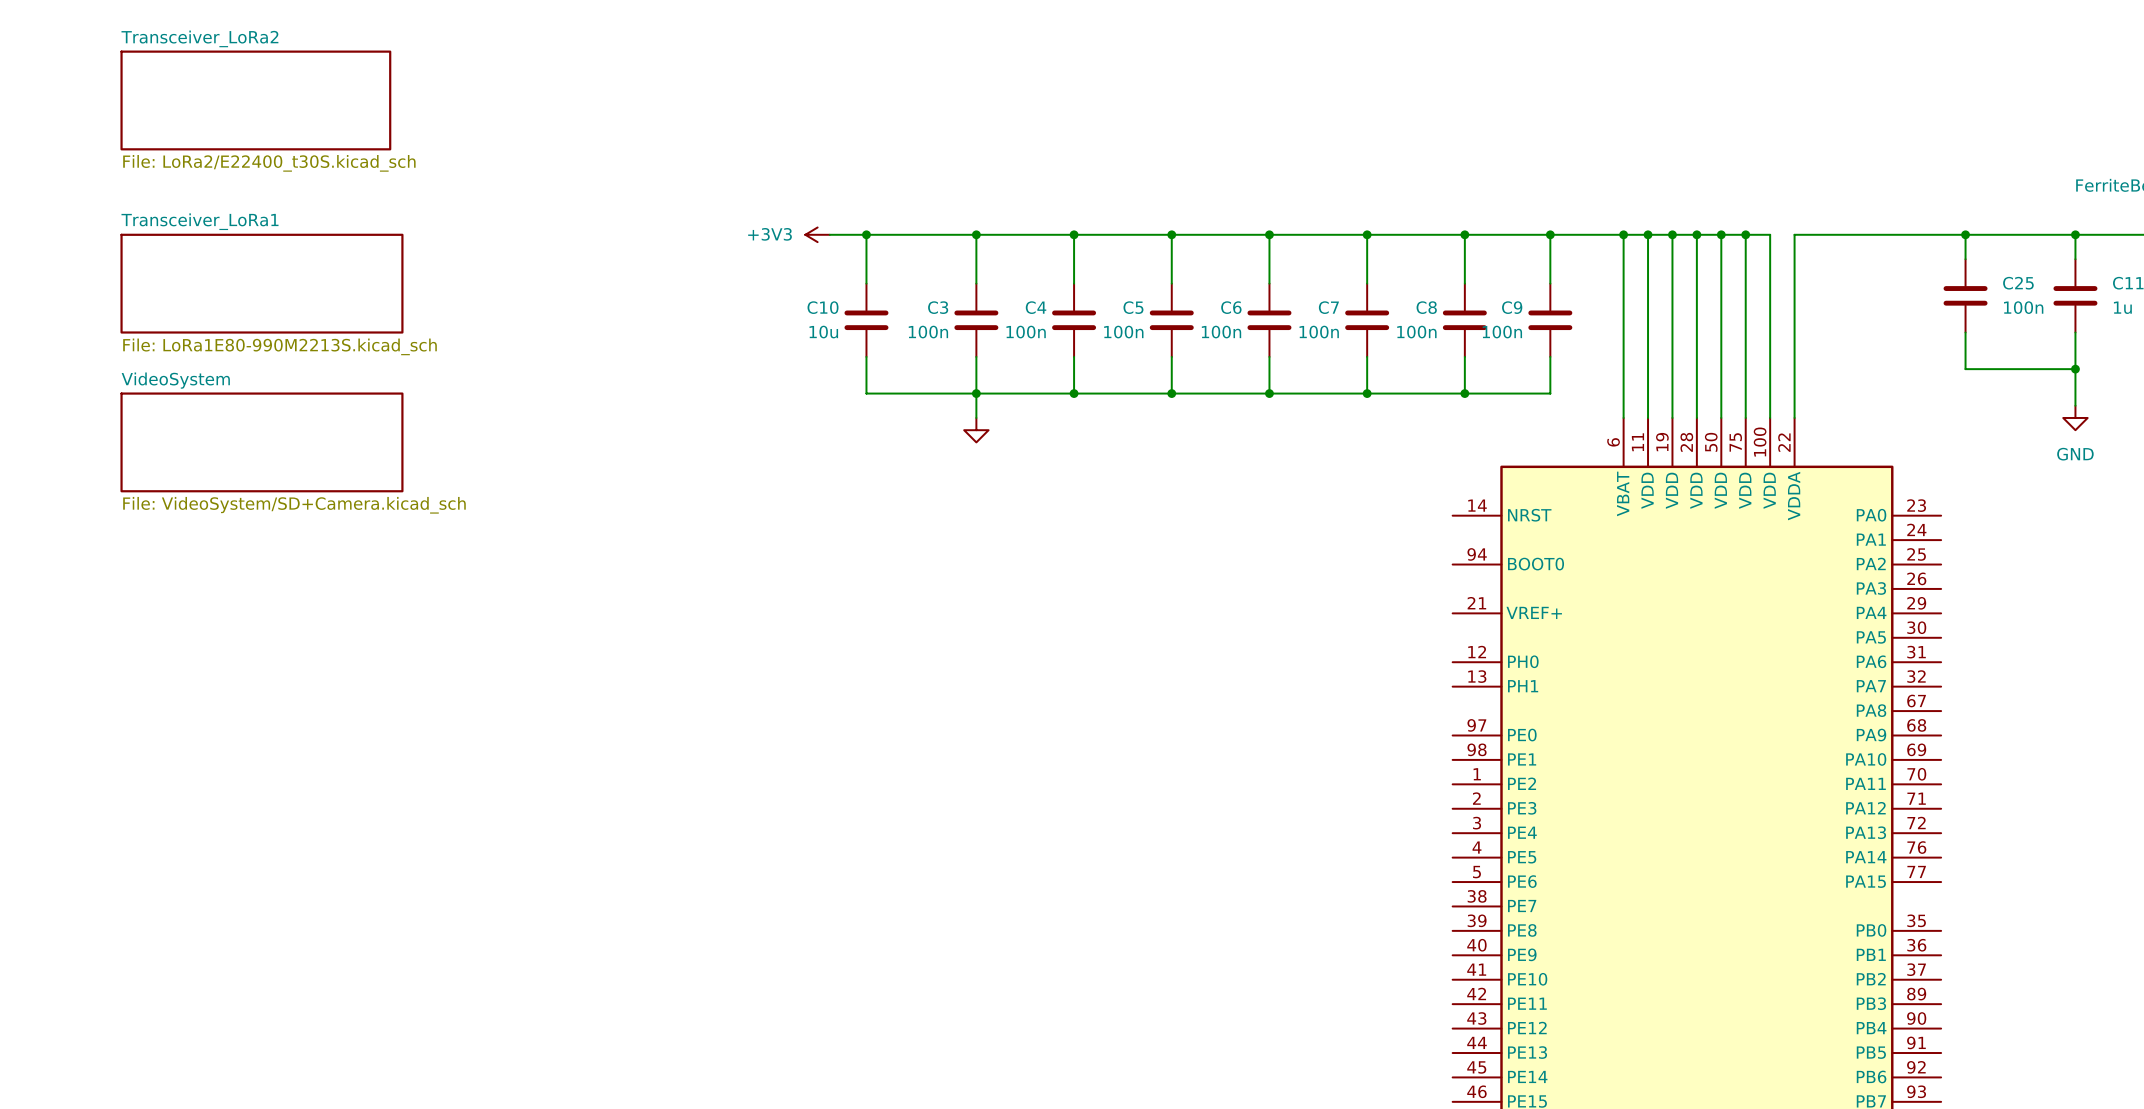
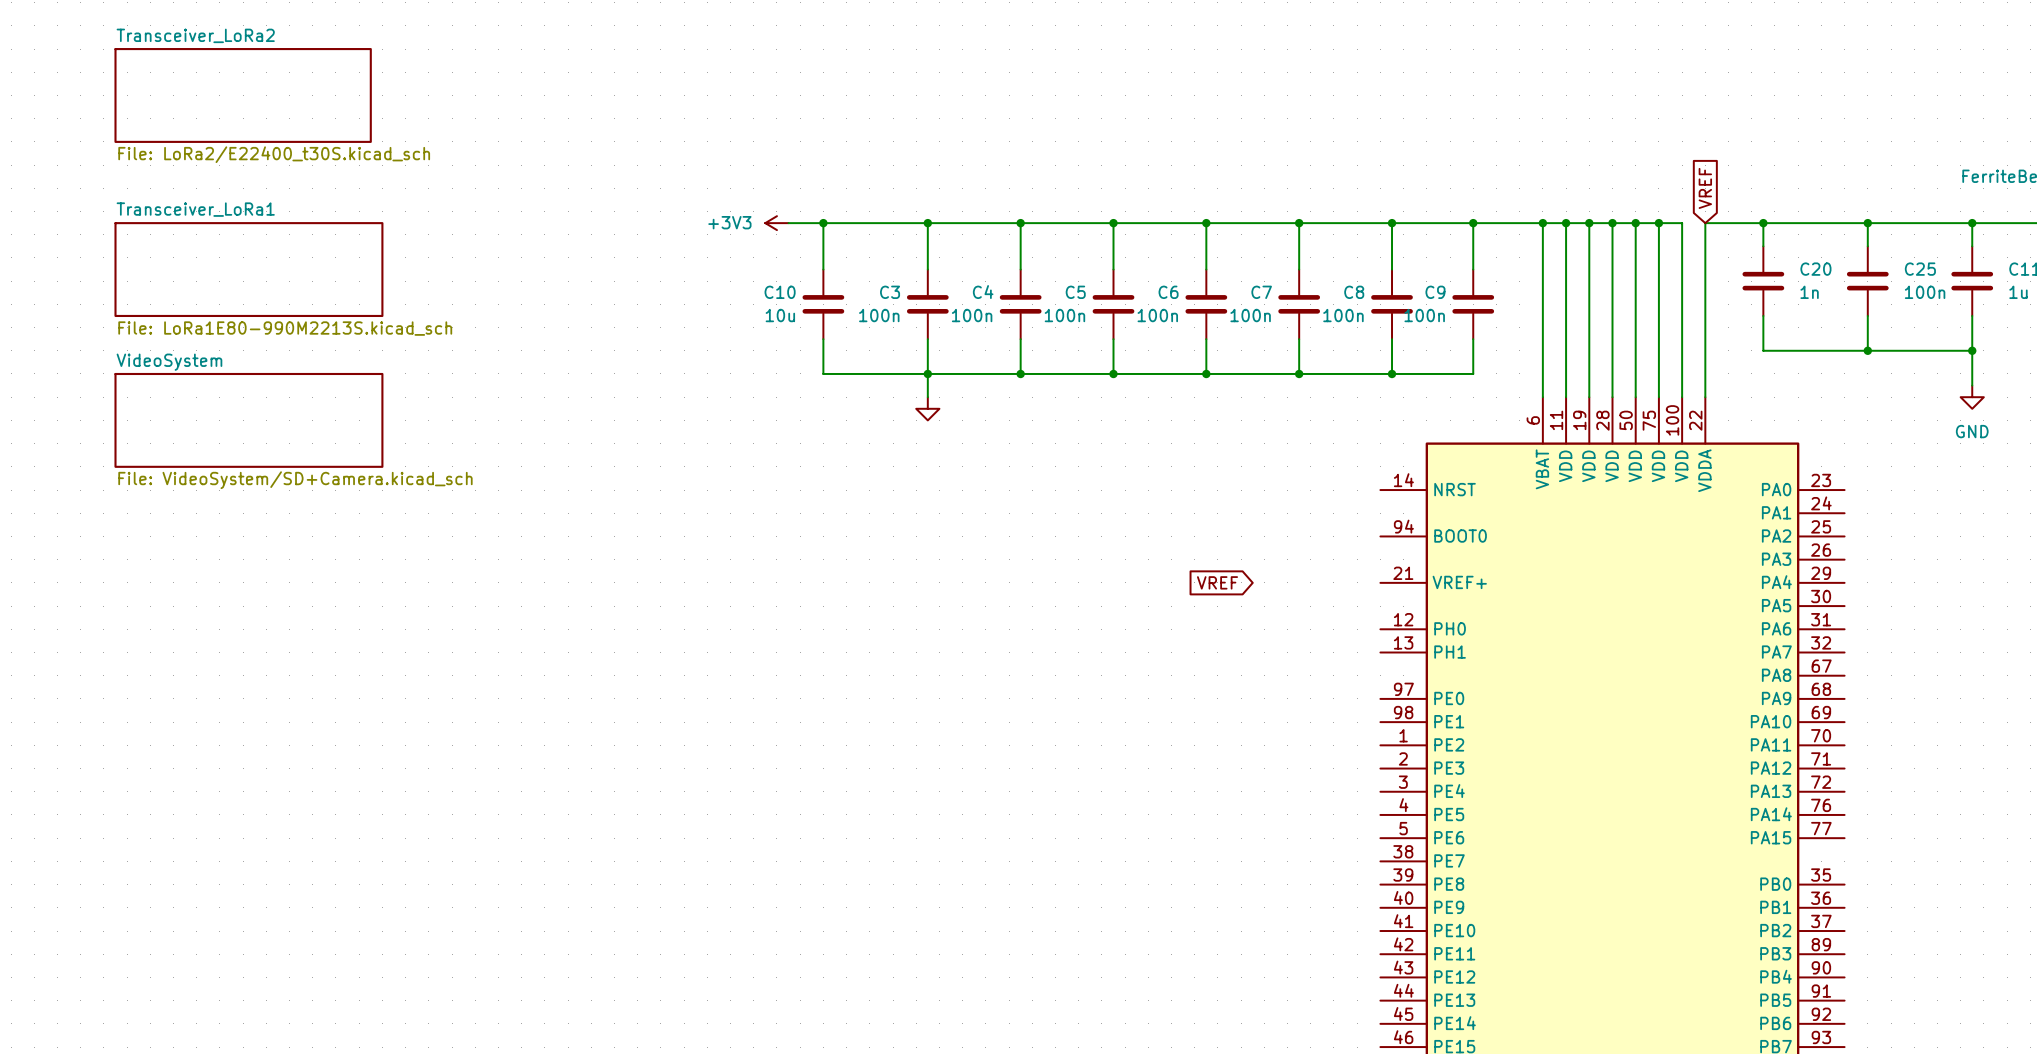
global label: none -> VREF (1705, 188)
wire: none -> (1763, 223) (1763, 246)
junction: none -> (1763, 223)
C20: none -> 1n (1763, 281)
wire: none -> (1763, 315) (1763, 350) (1867, 350)
junction: none -> (1867, 350)
global label: none -> VREF (1217, 582)

